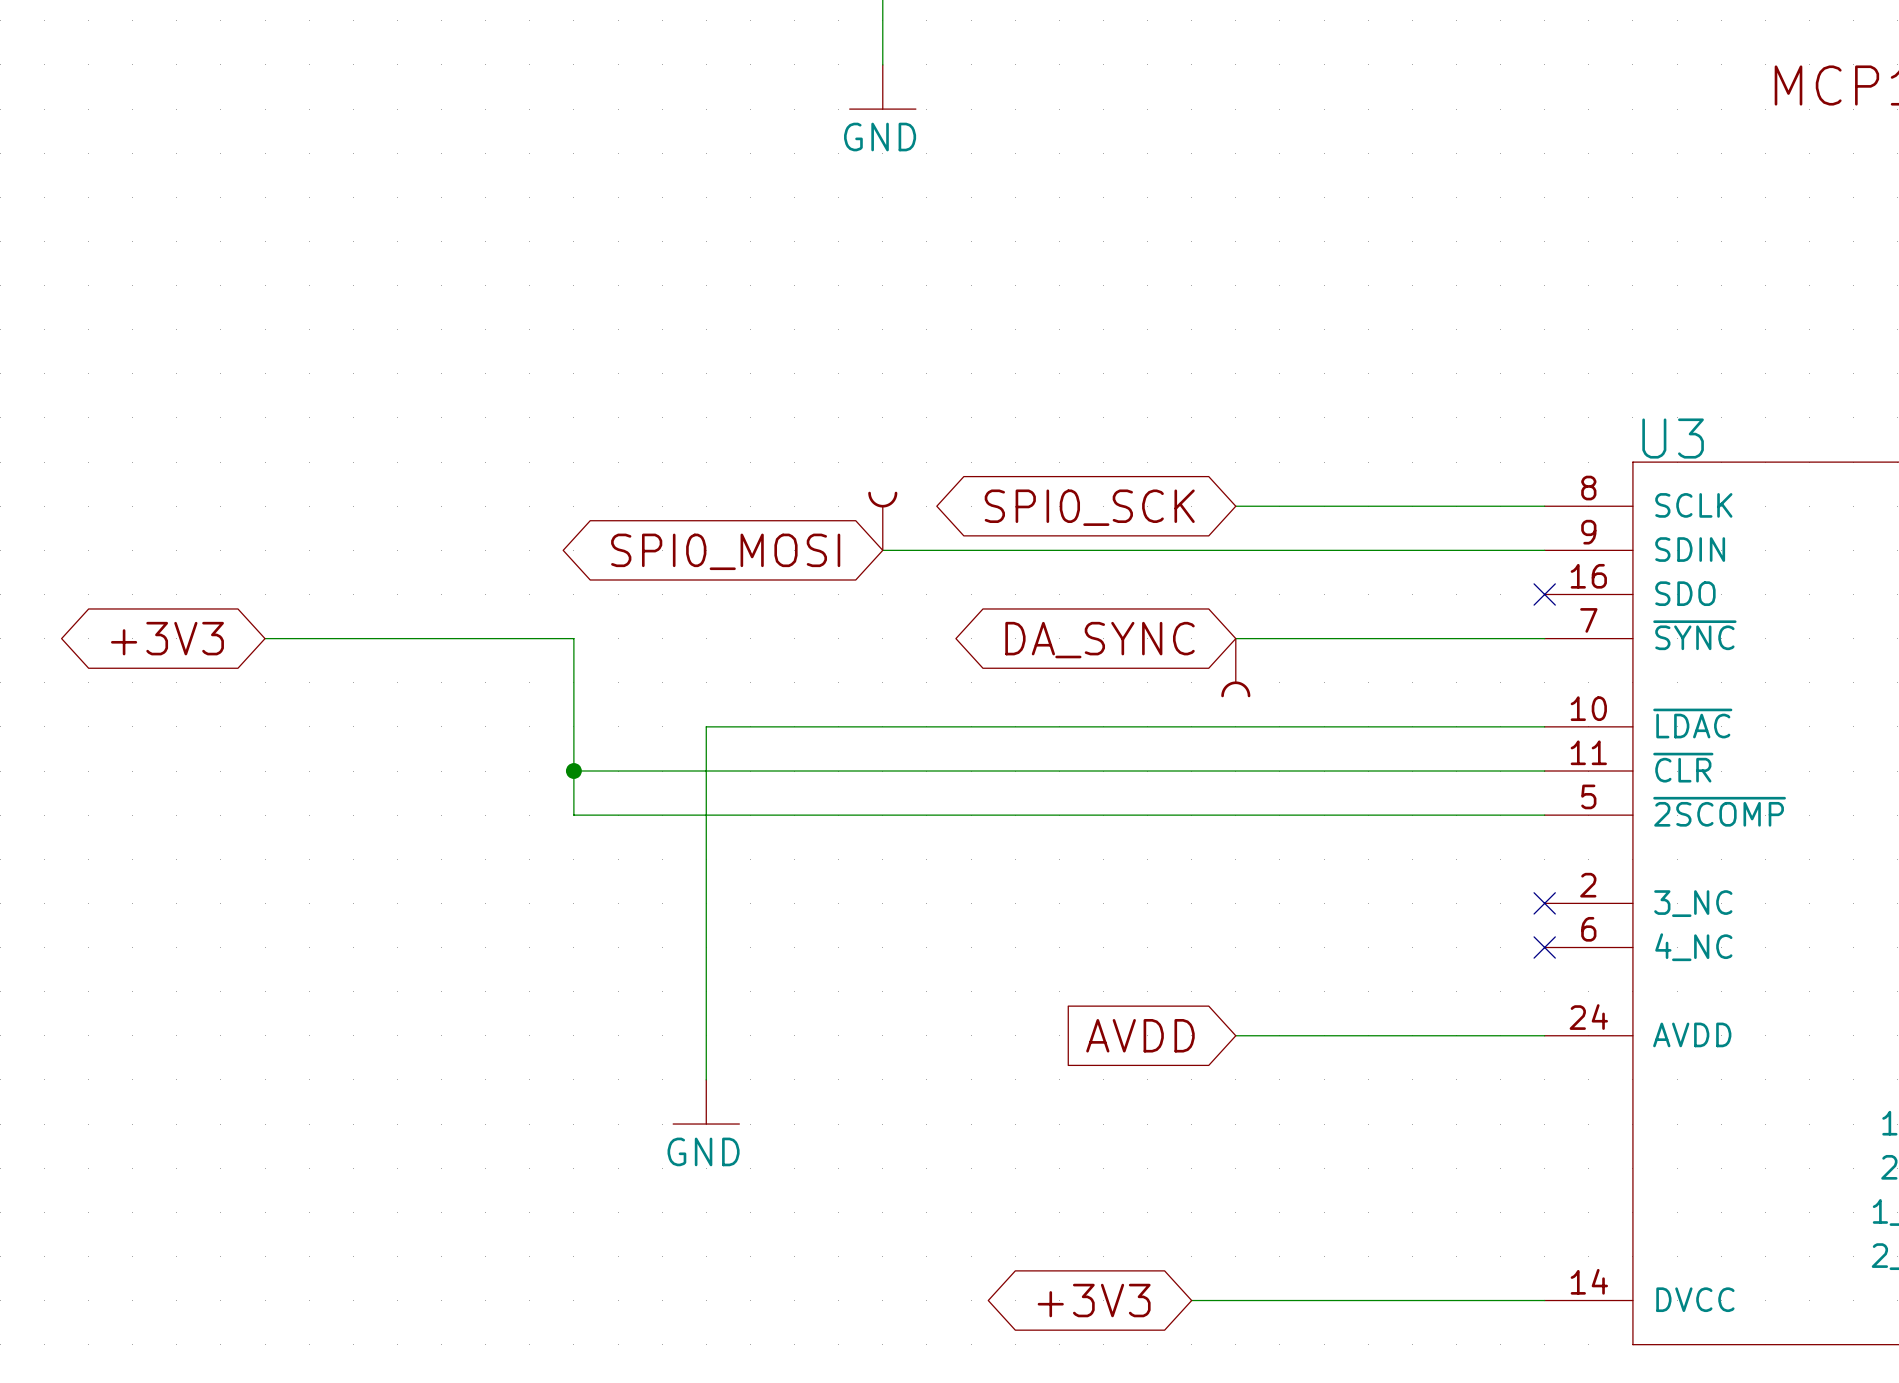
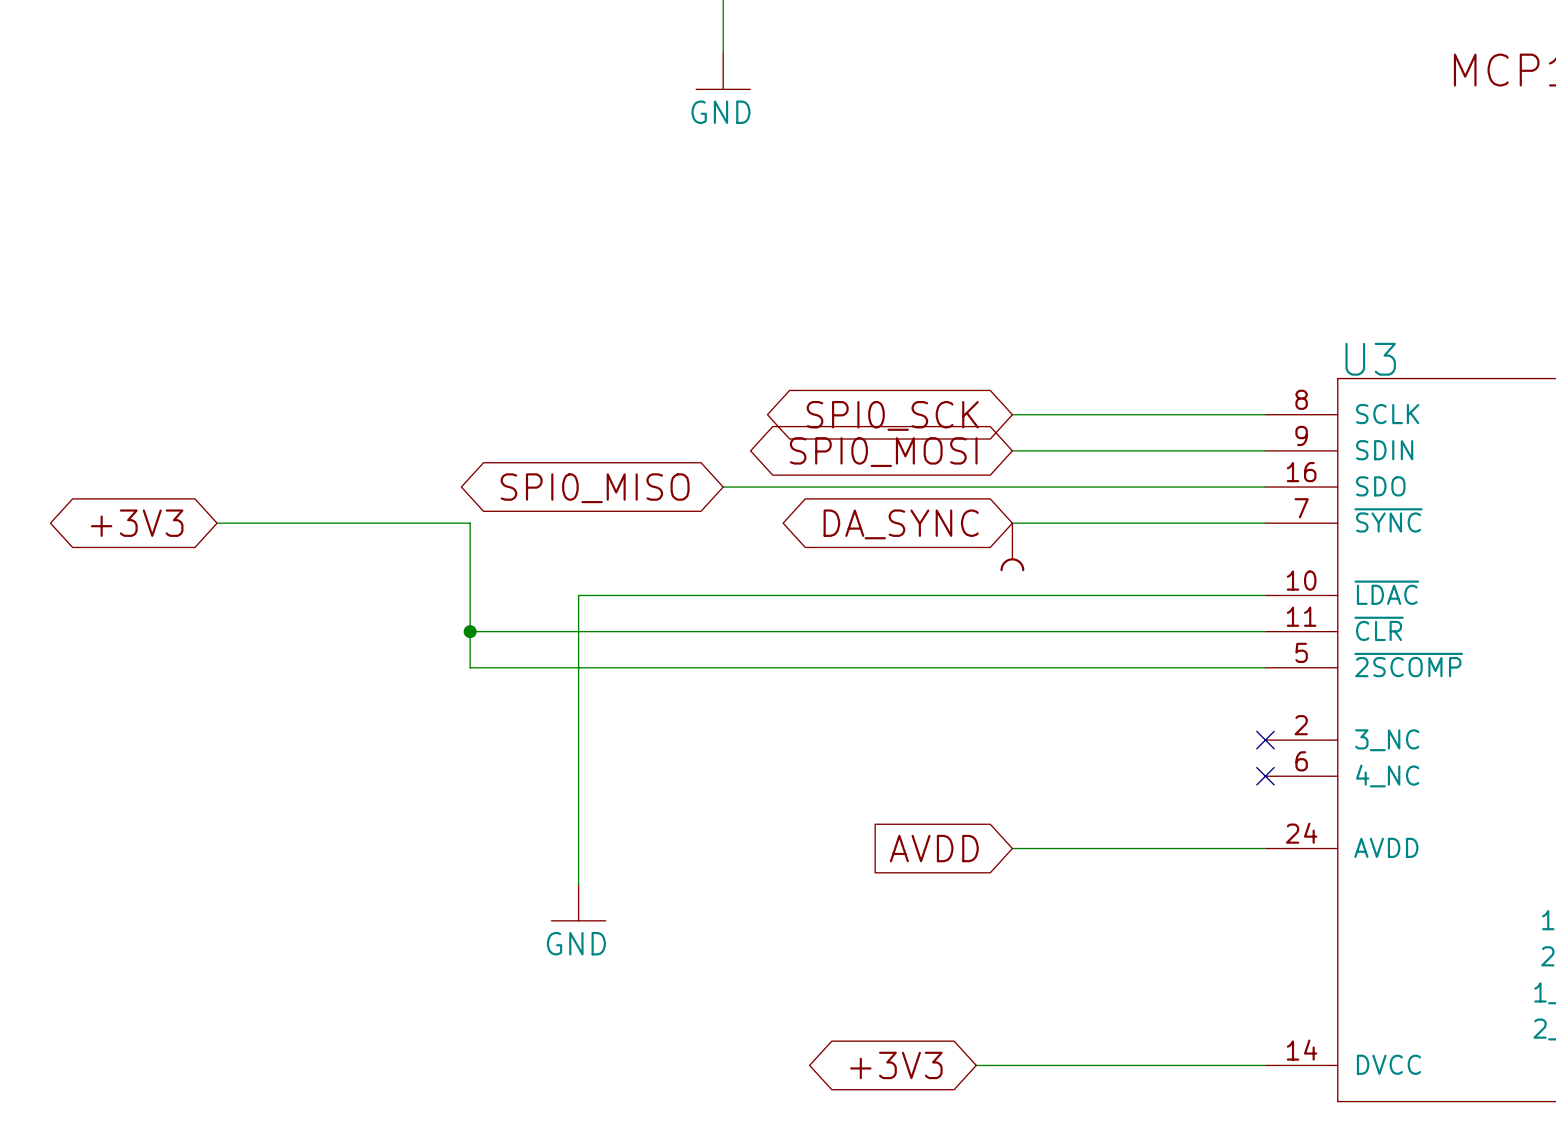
part: (882, 521) -> none
wire: (882, 550) (1235, 550) -> none
global label position: SPI0_MOSI (725, 551) -> SPI0_MOSI (883, 452)
wire: none -> (723, 487) (1265, 487)
no-connect mark: (1544, 594) -> none
global label: none -> SPI0_MISO (595, 488)

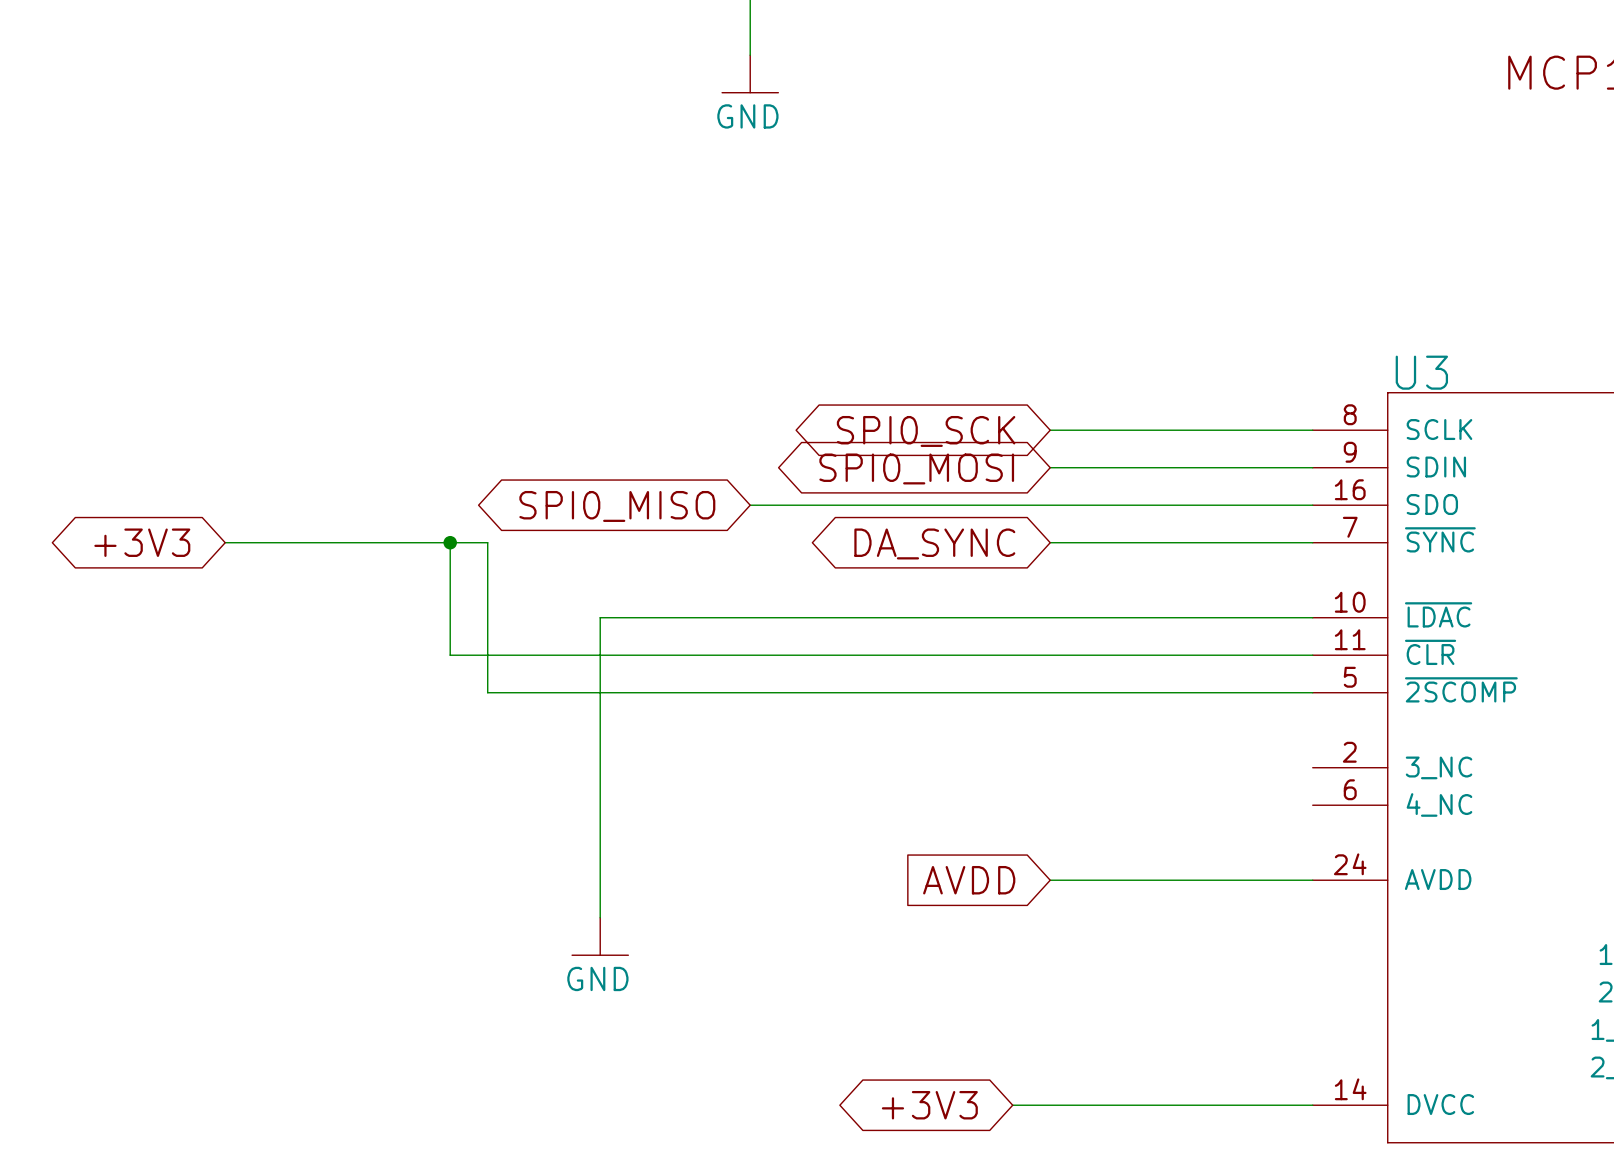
wire: none -> (450, 542) (450, 655) (487, 655)
junction: none -> (450, 542)
part: (1012, 547) -> none
junction: (470, 631) -> none
no-connect mark: (1265, 740) -> none
no-connect mark: (1265, 776) -> none

